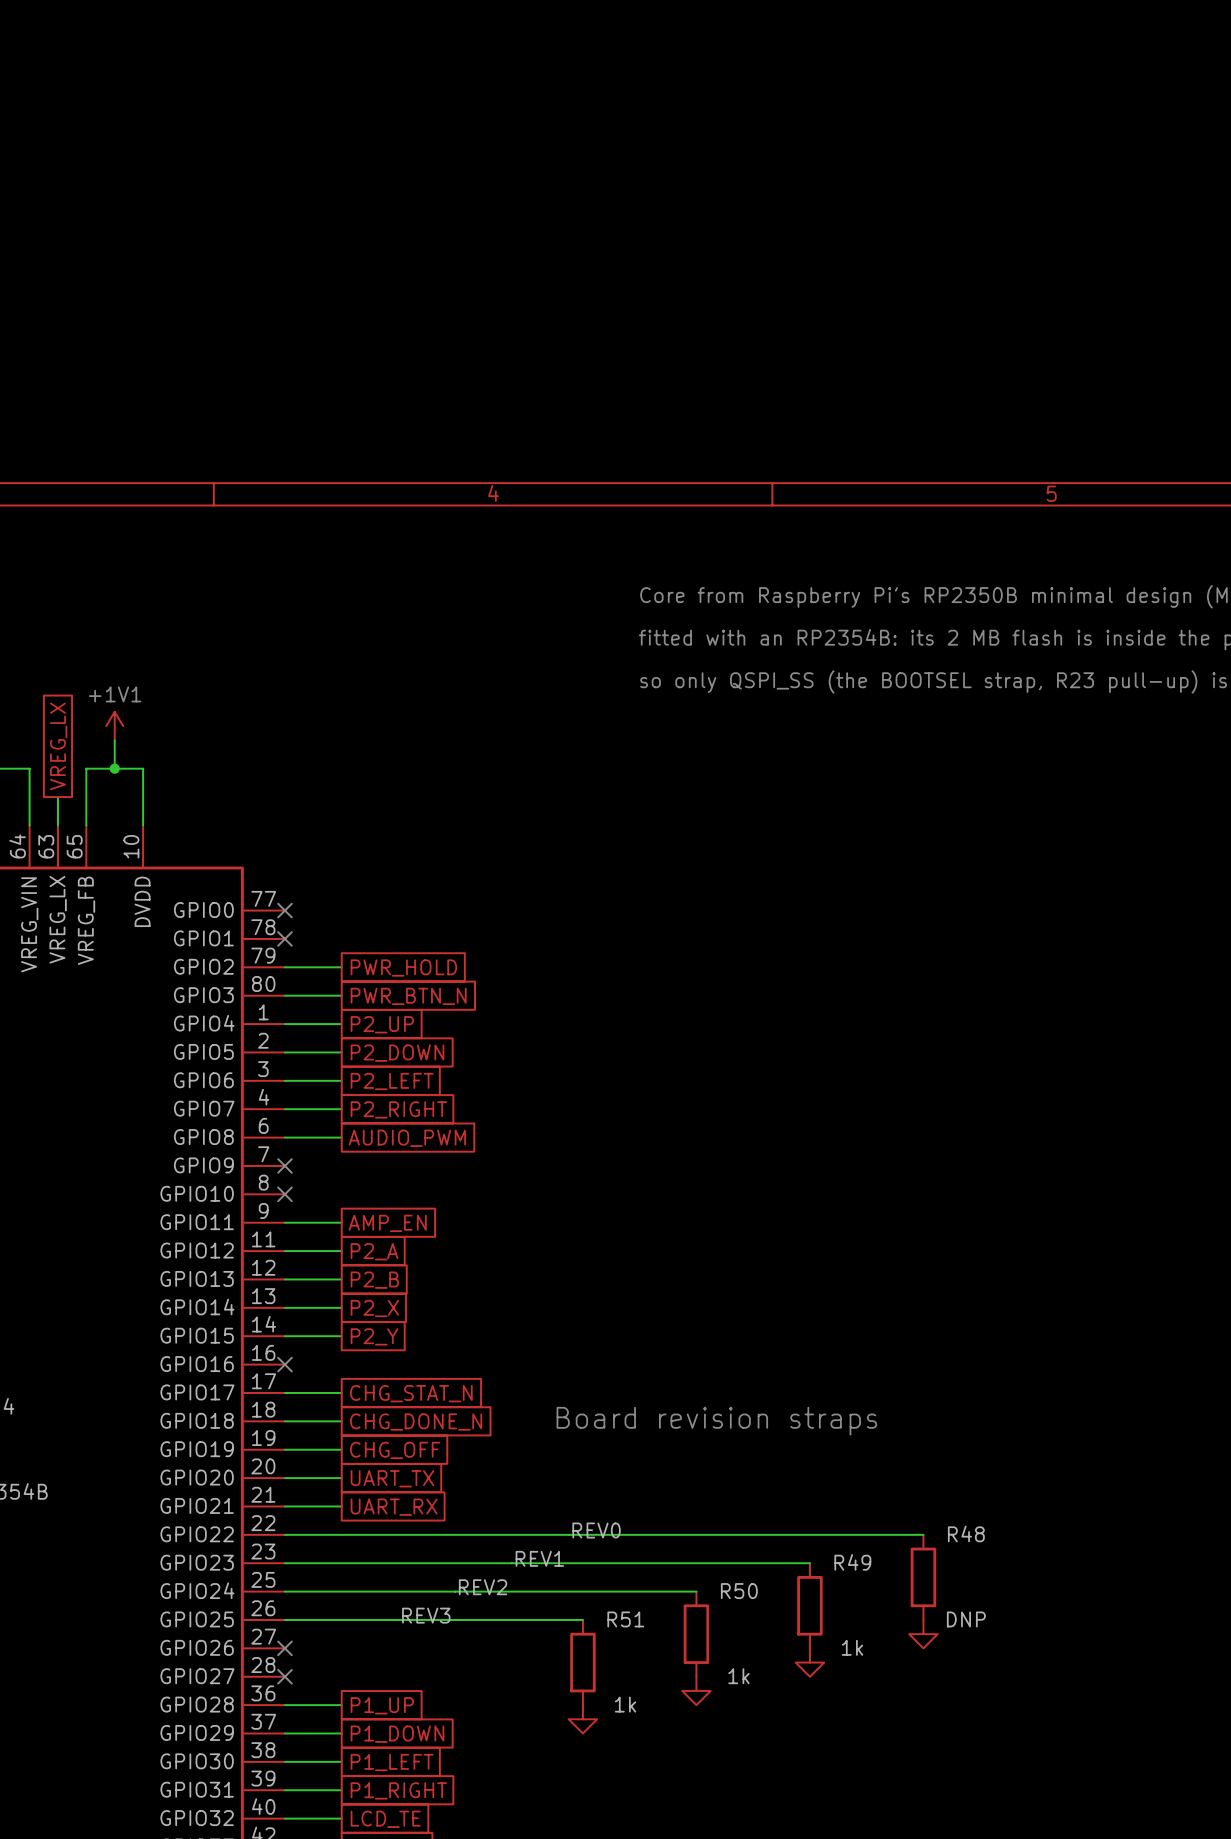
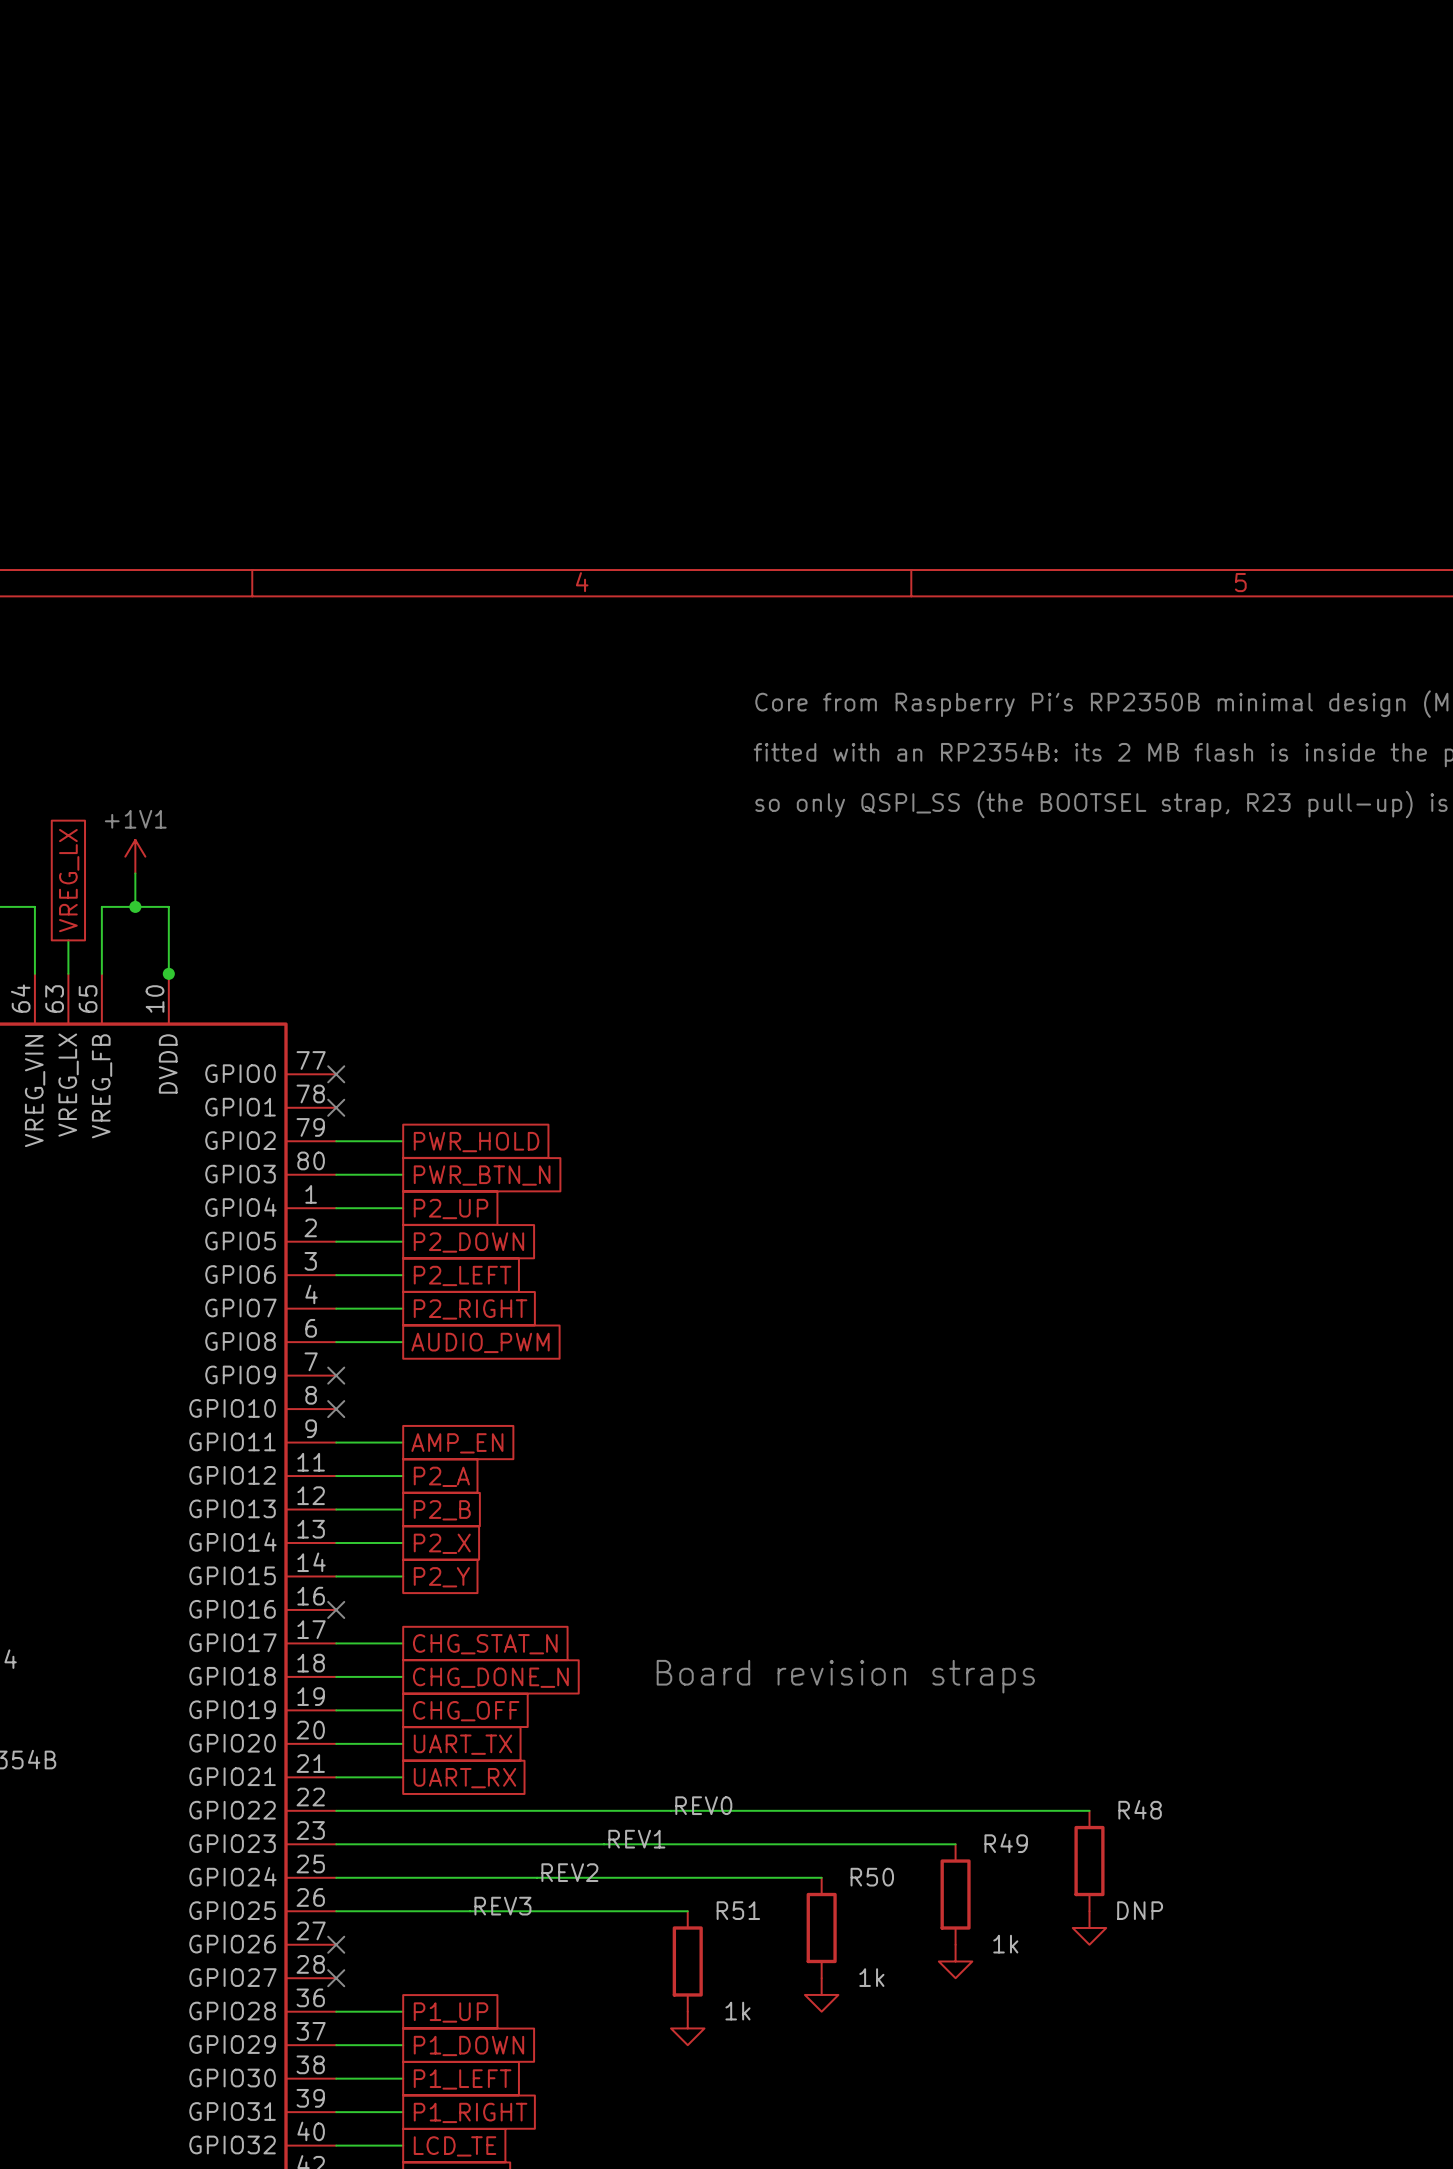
junction: none -> (168, 973)

